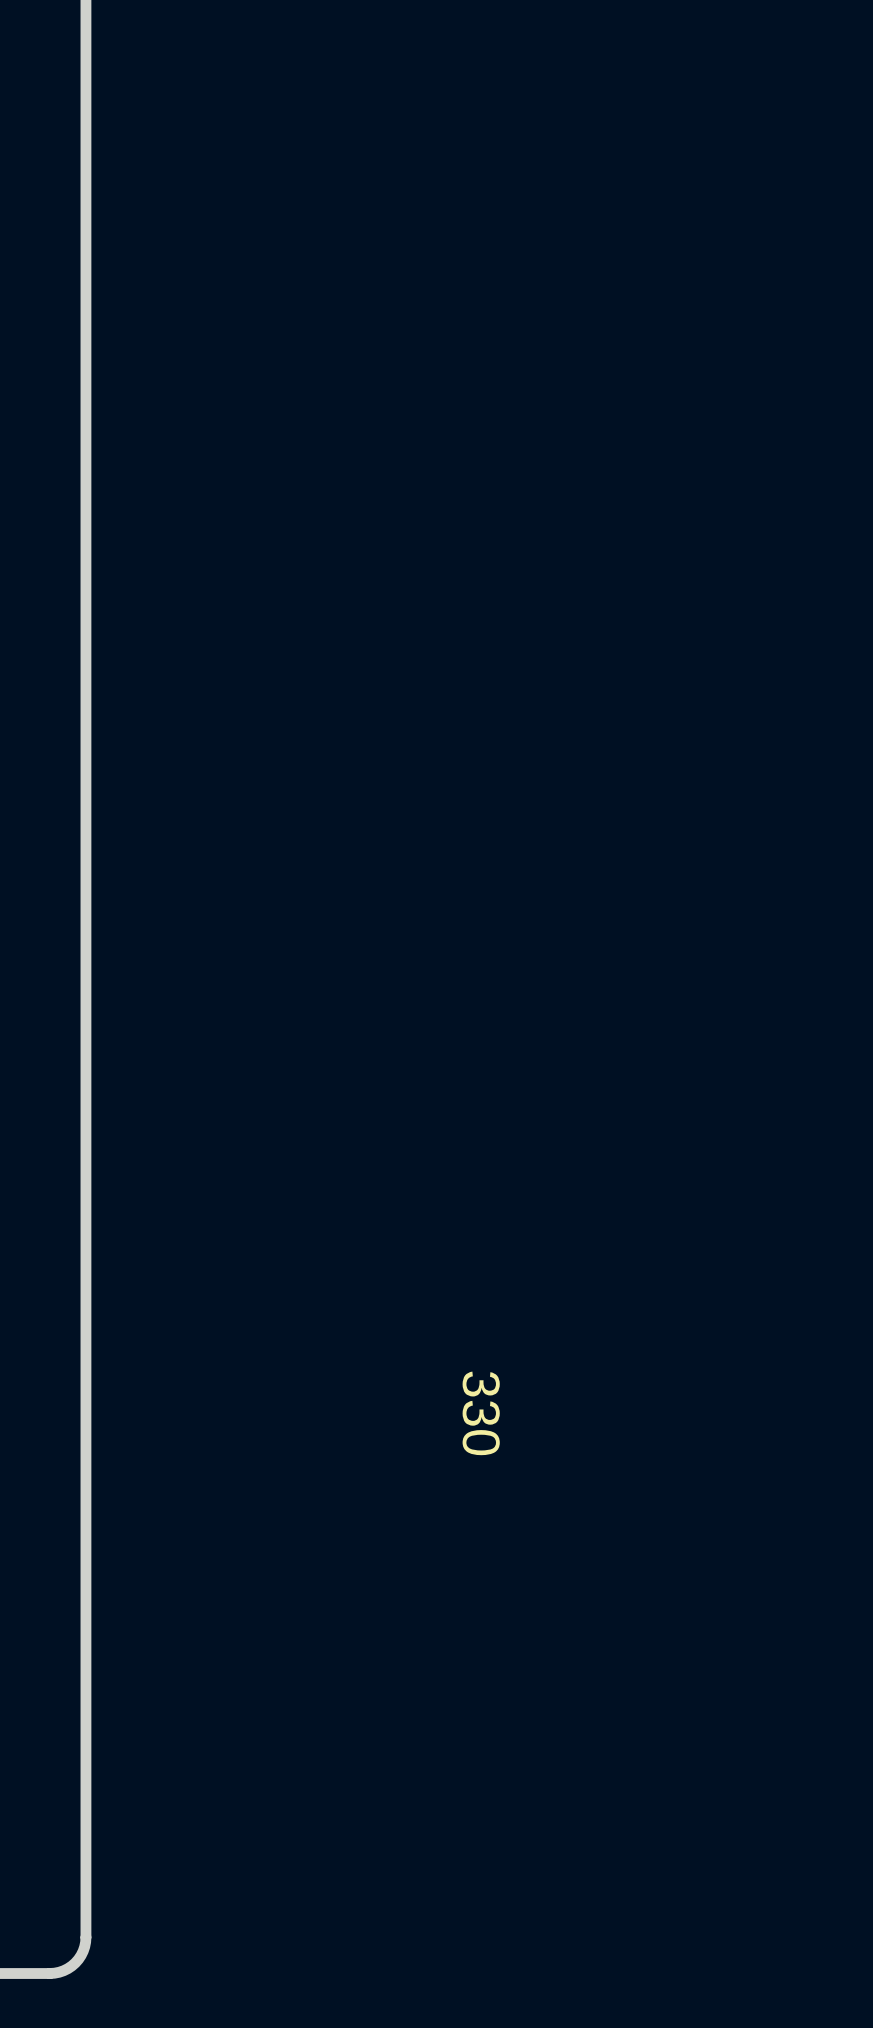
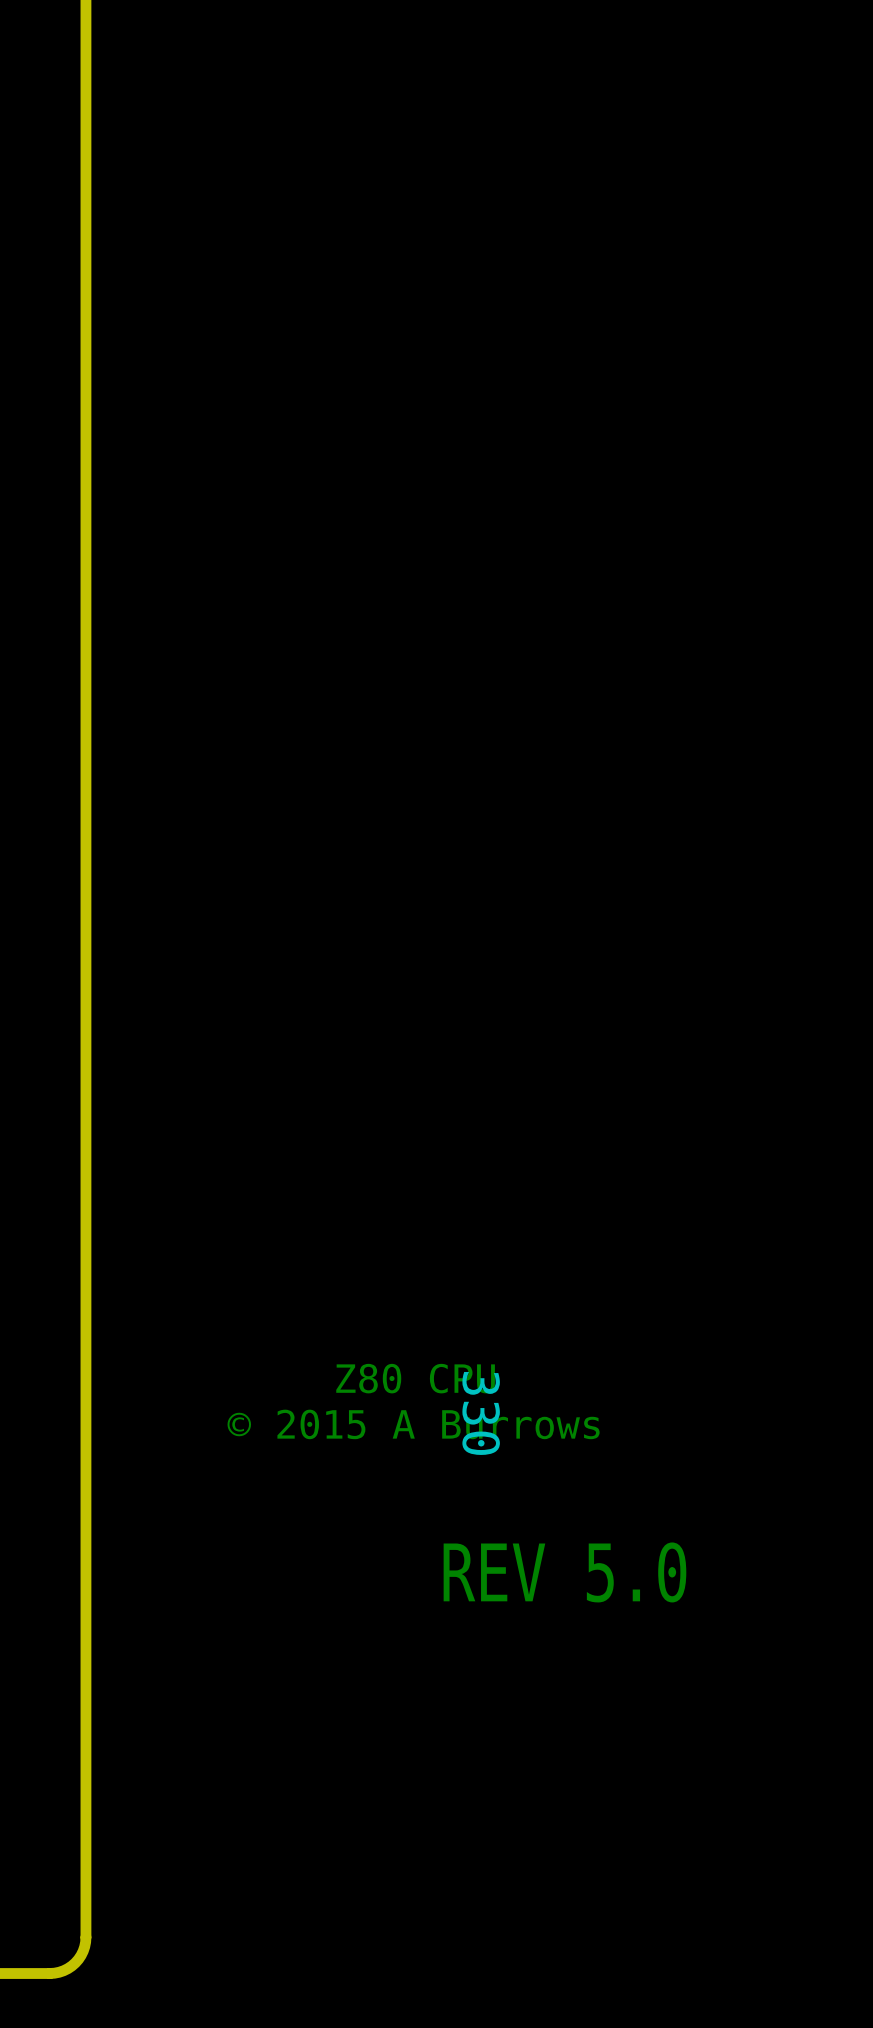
text: none -> Z80 CPU (415, 1378)
text: none -> © 2015 A Burrows (413, 1424)
text: none -> REV 5.0 (564, 1572)

